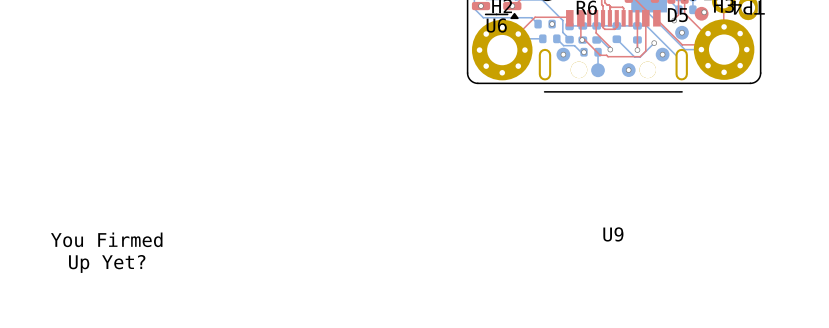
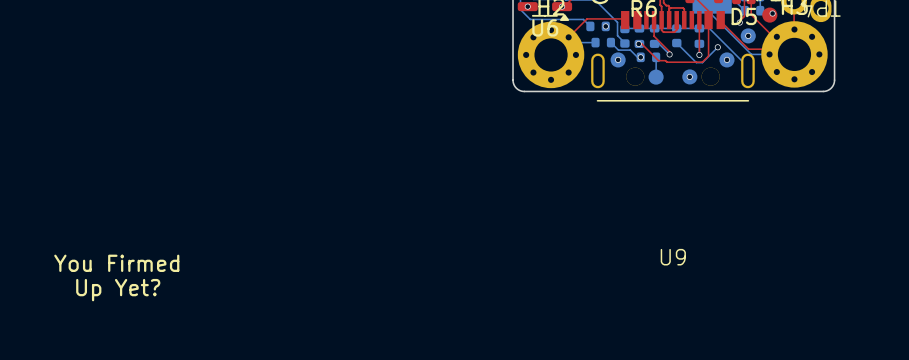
top track: (580, 18) (582, 40) -> none

